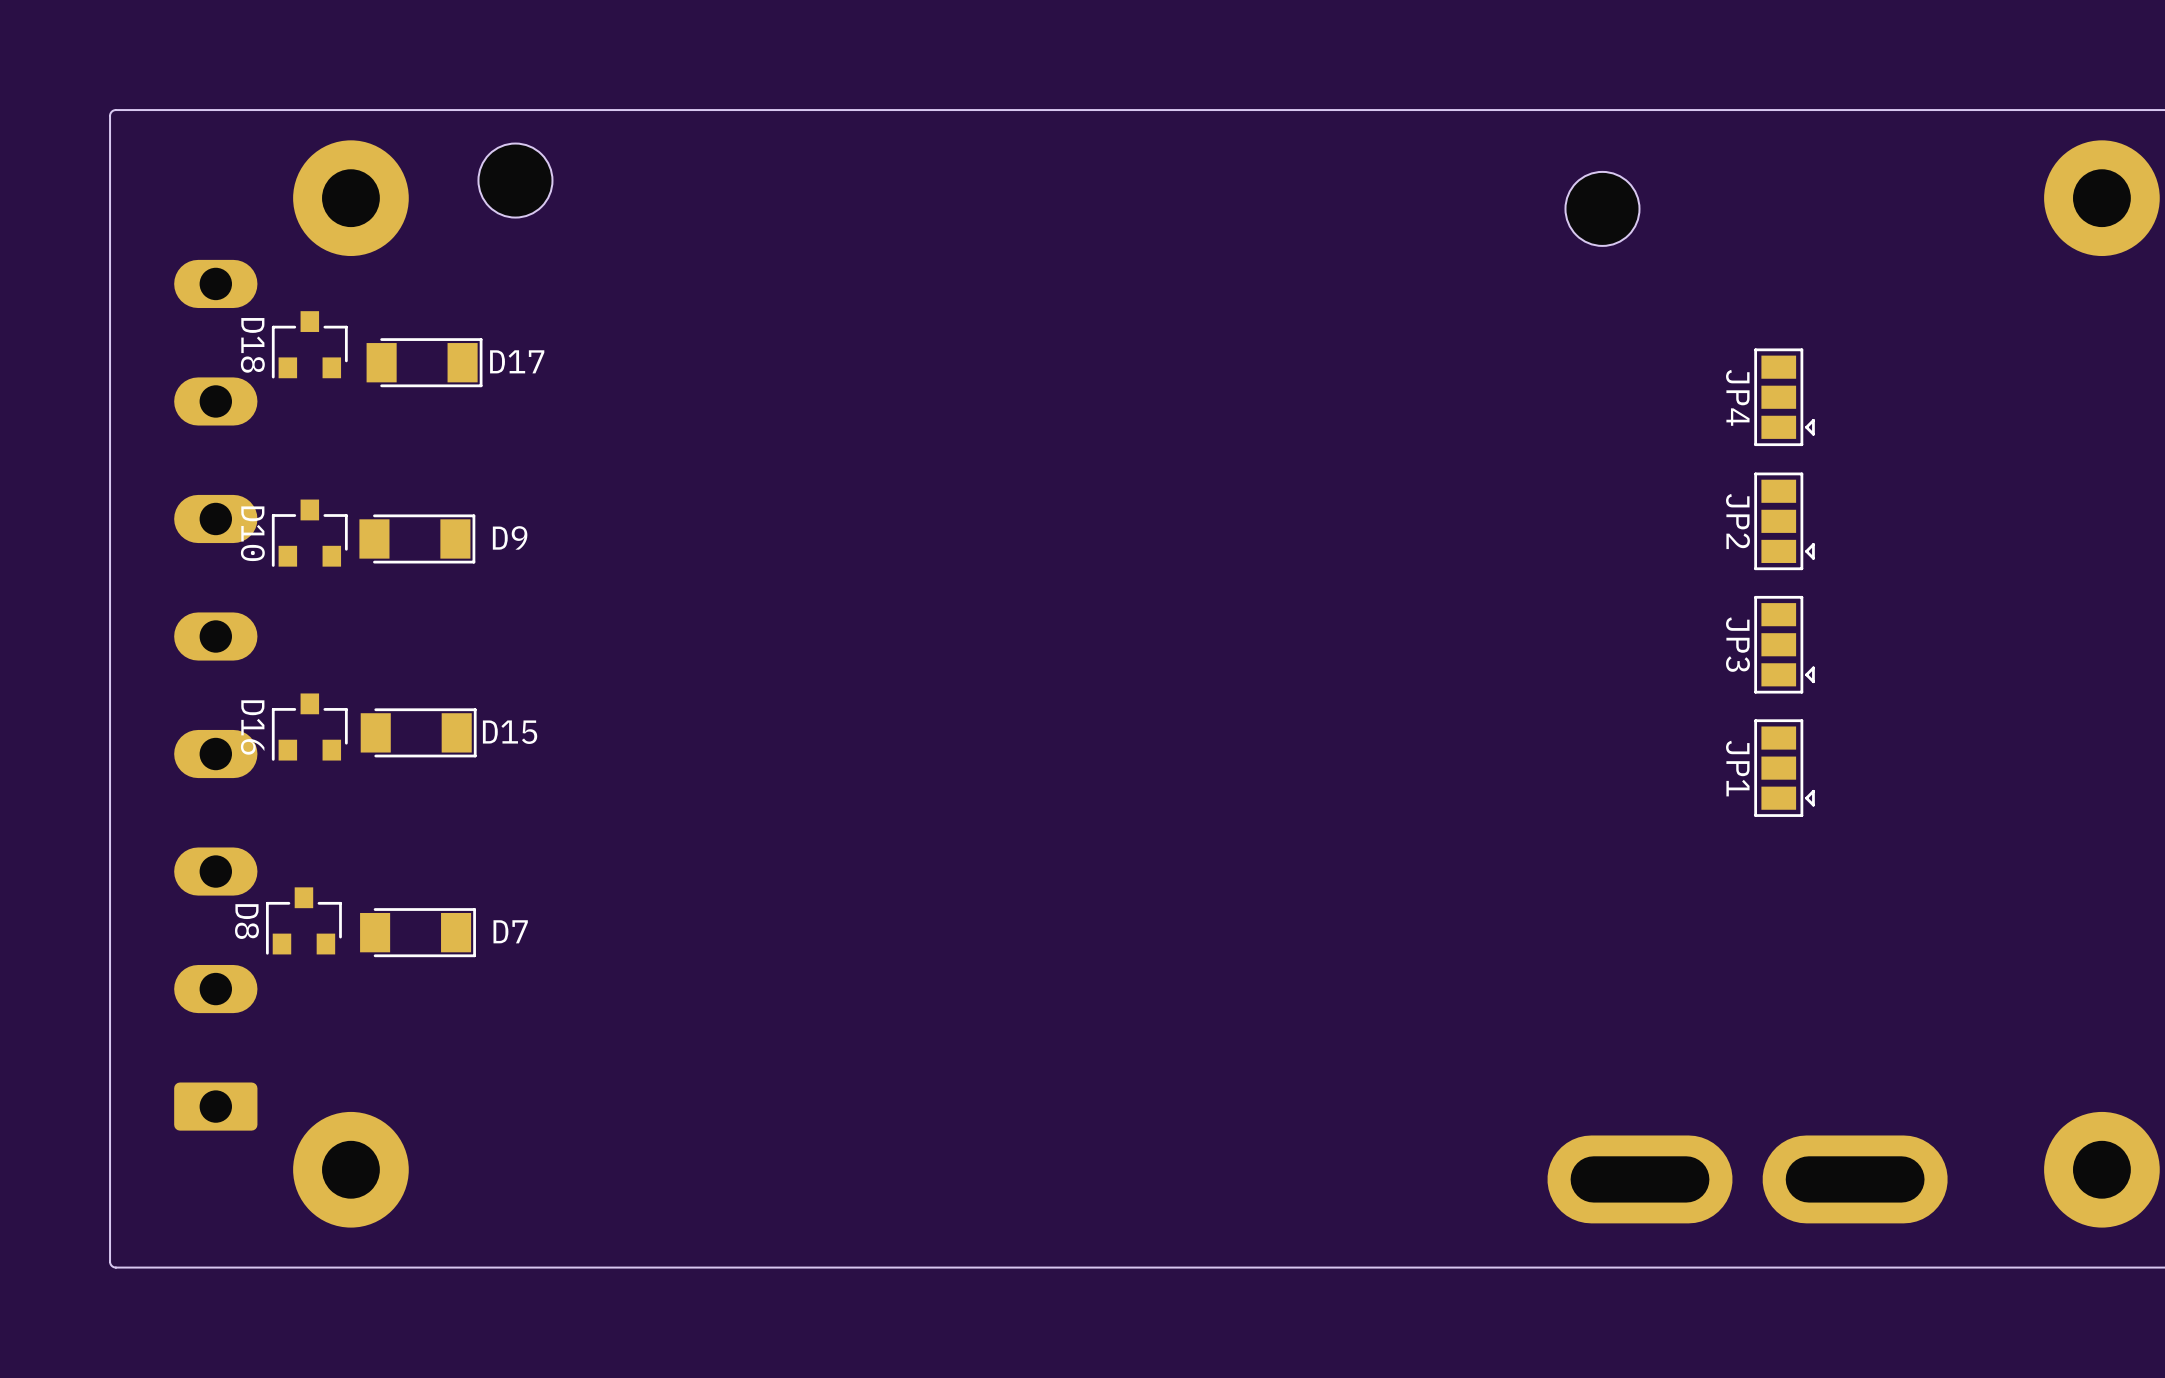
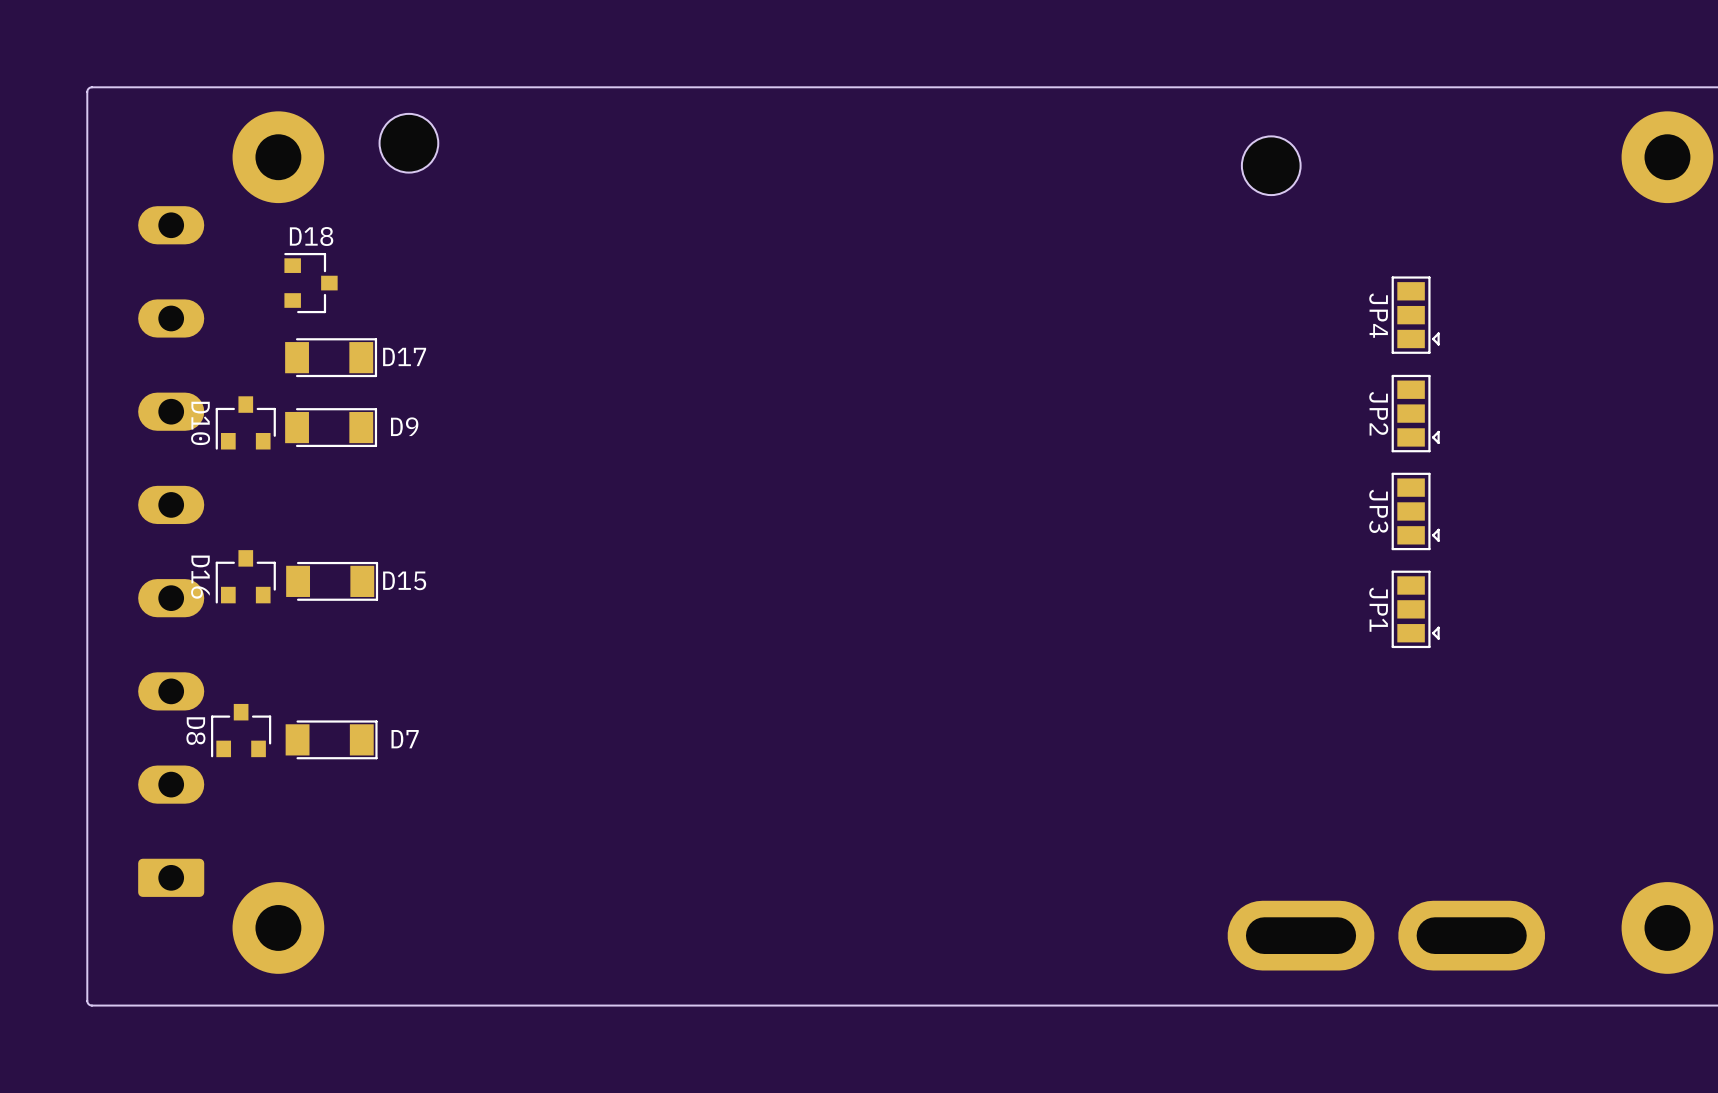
D18 rotation: 0° (309, 344) -> 90° clockwise (310, 283)
D18 position: (309, 344) -> (310, 283)
D17 position: (424, 362) -> (331, 357)

